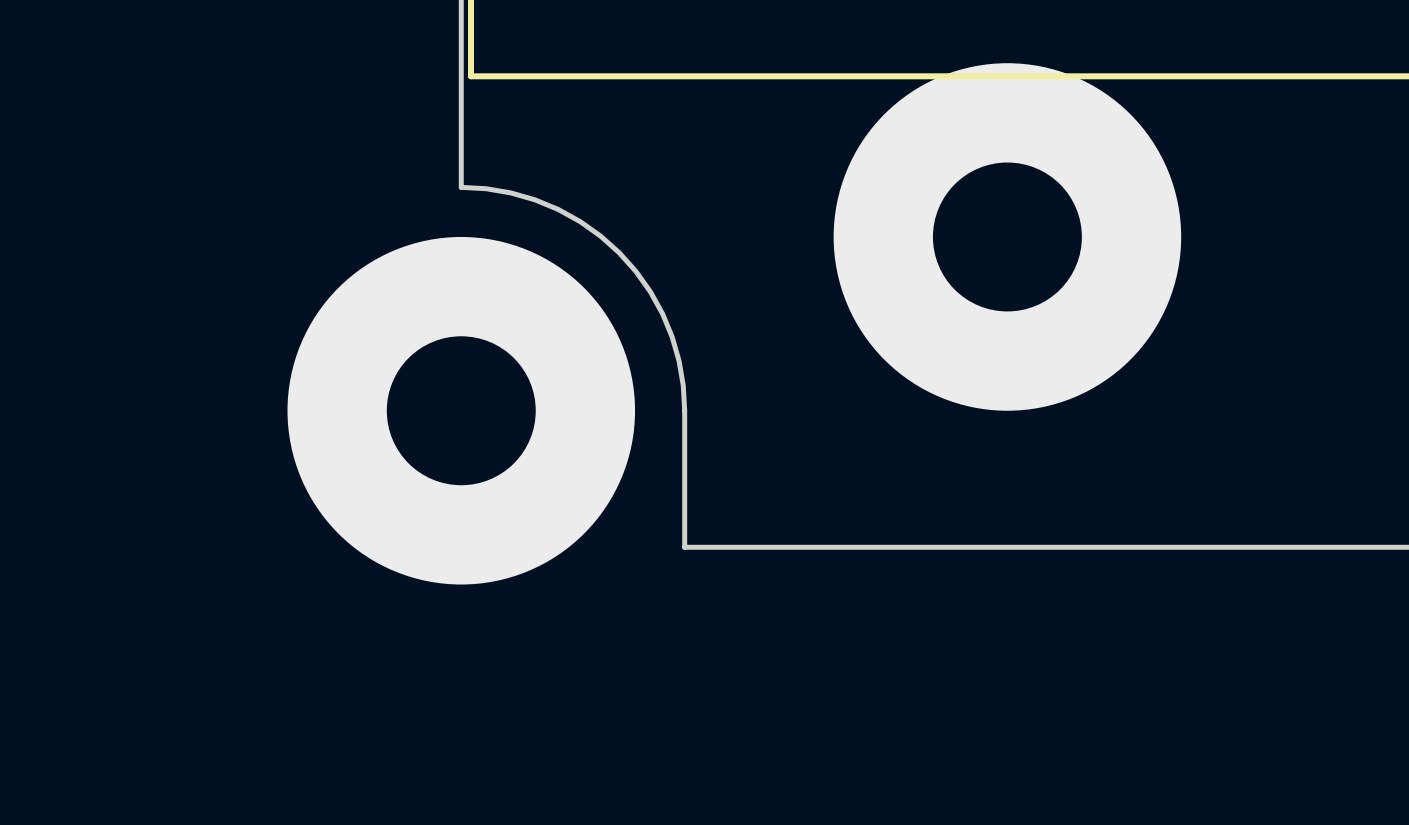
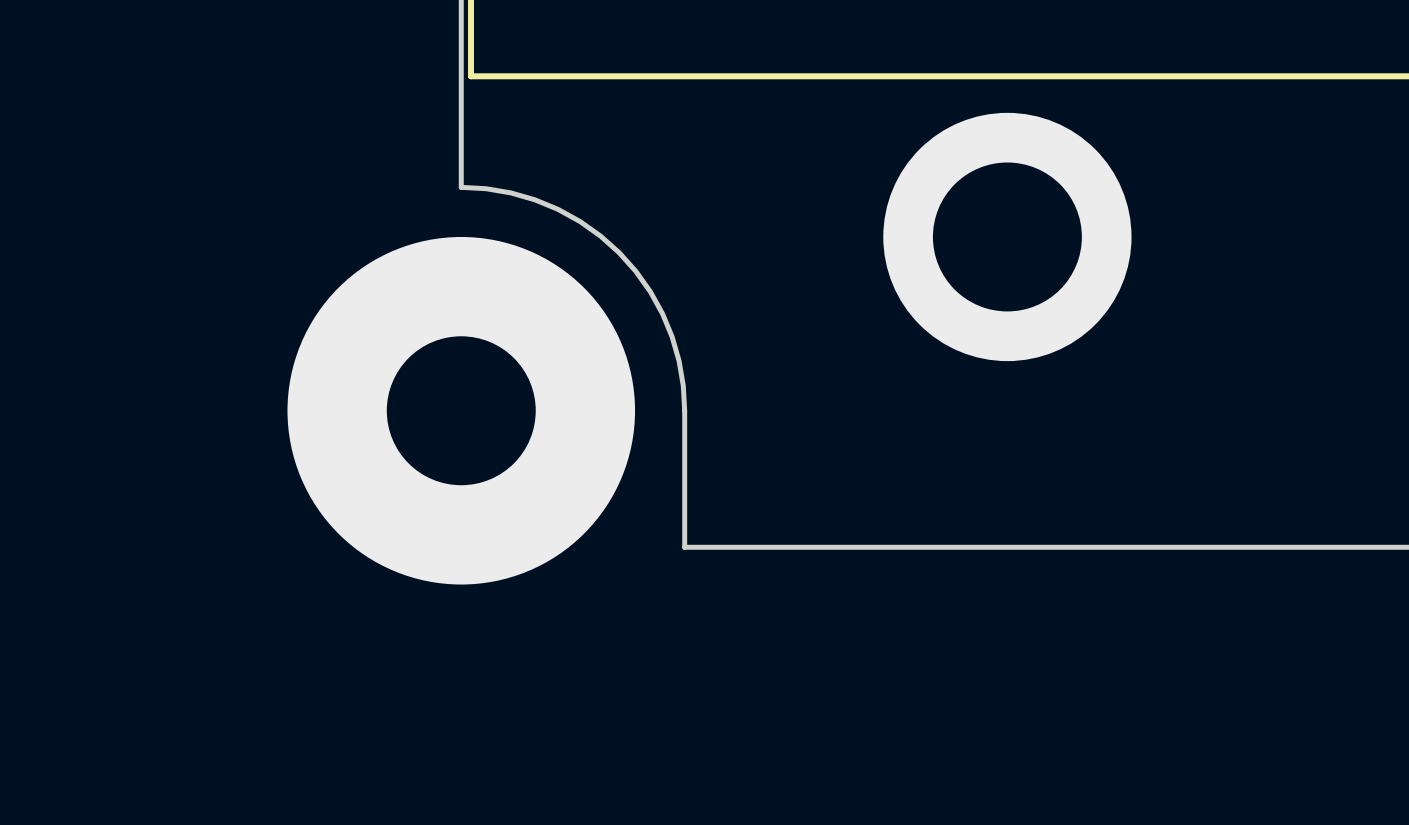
via size: [833, 63, 1182, 411] -> [883, 112, 1132, 362]

